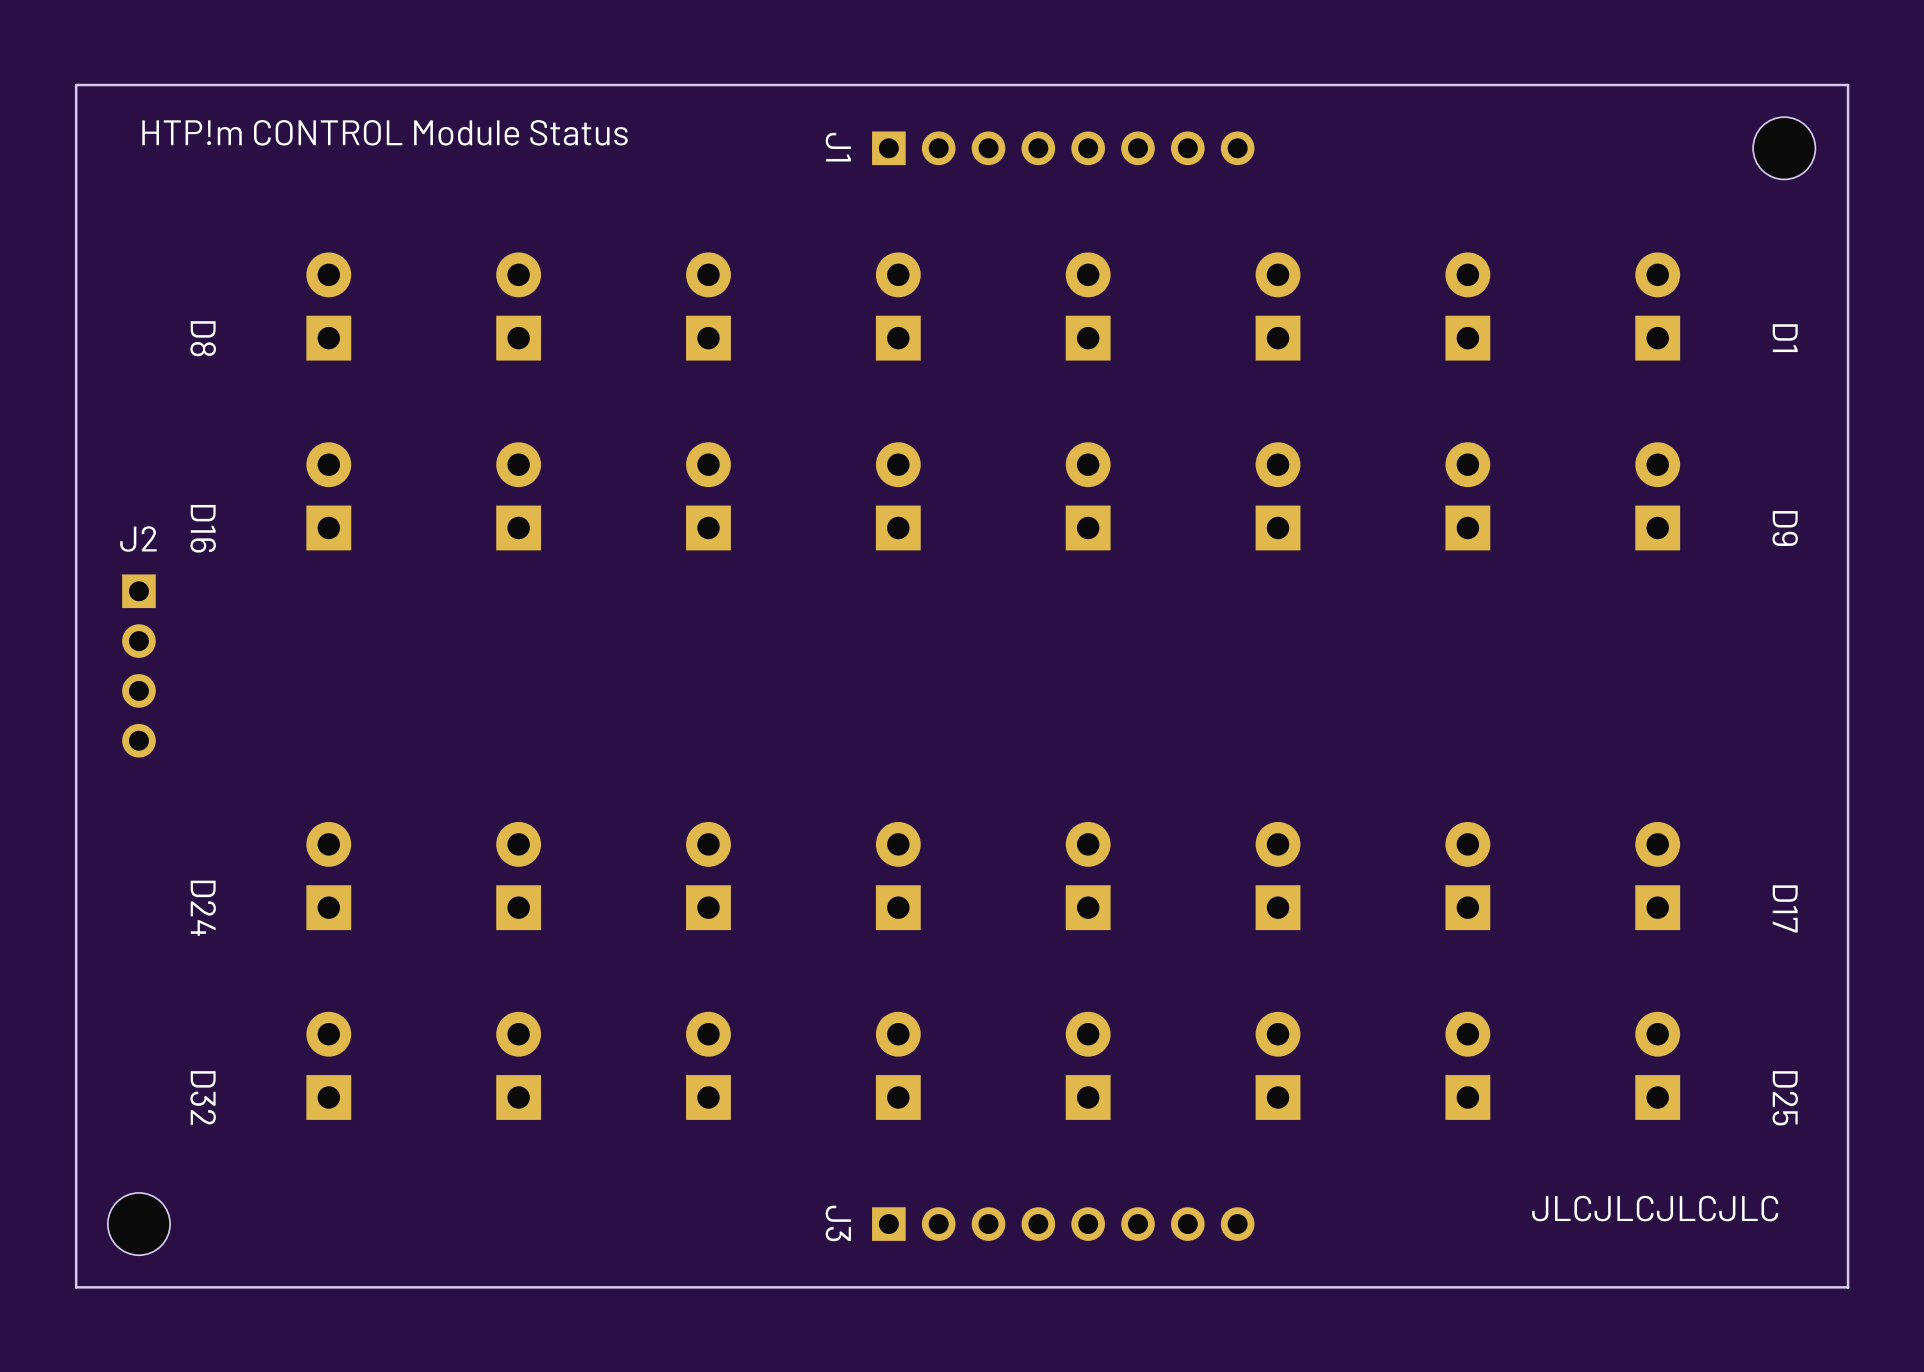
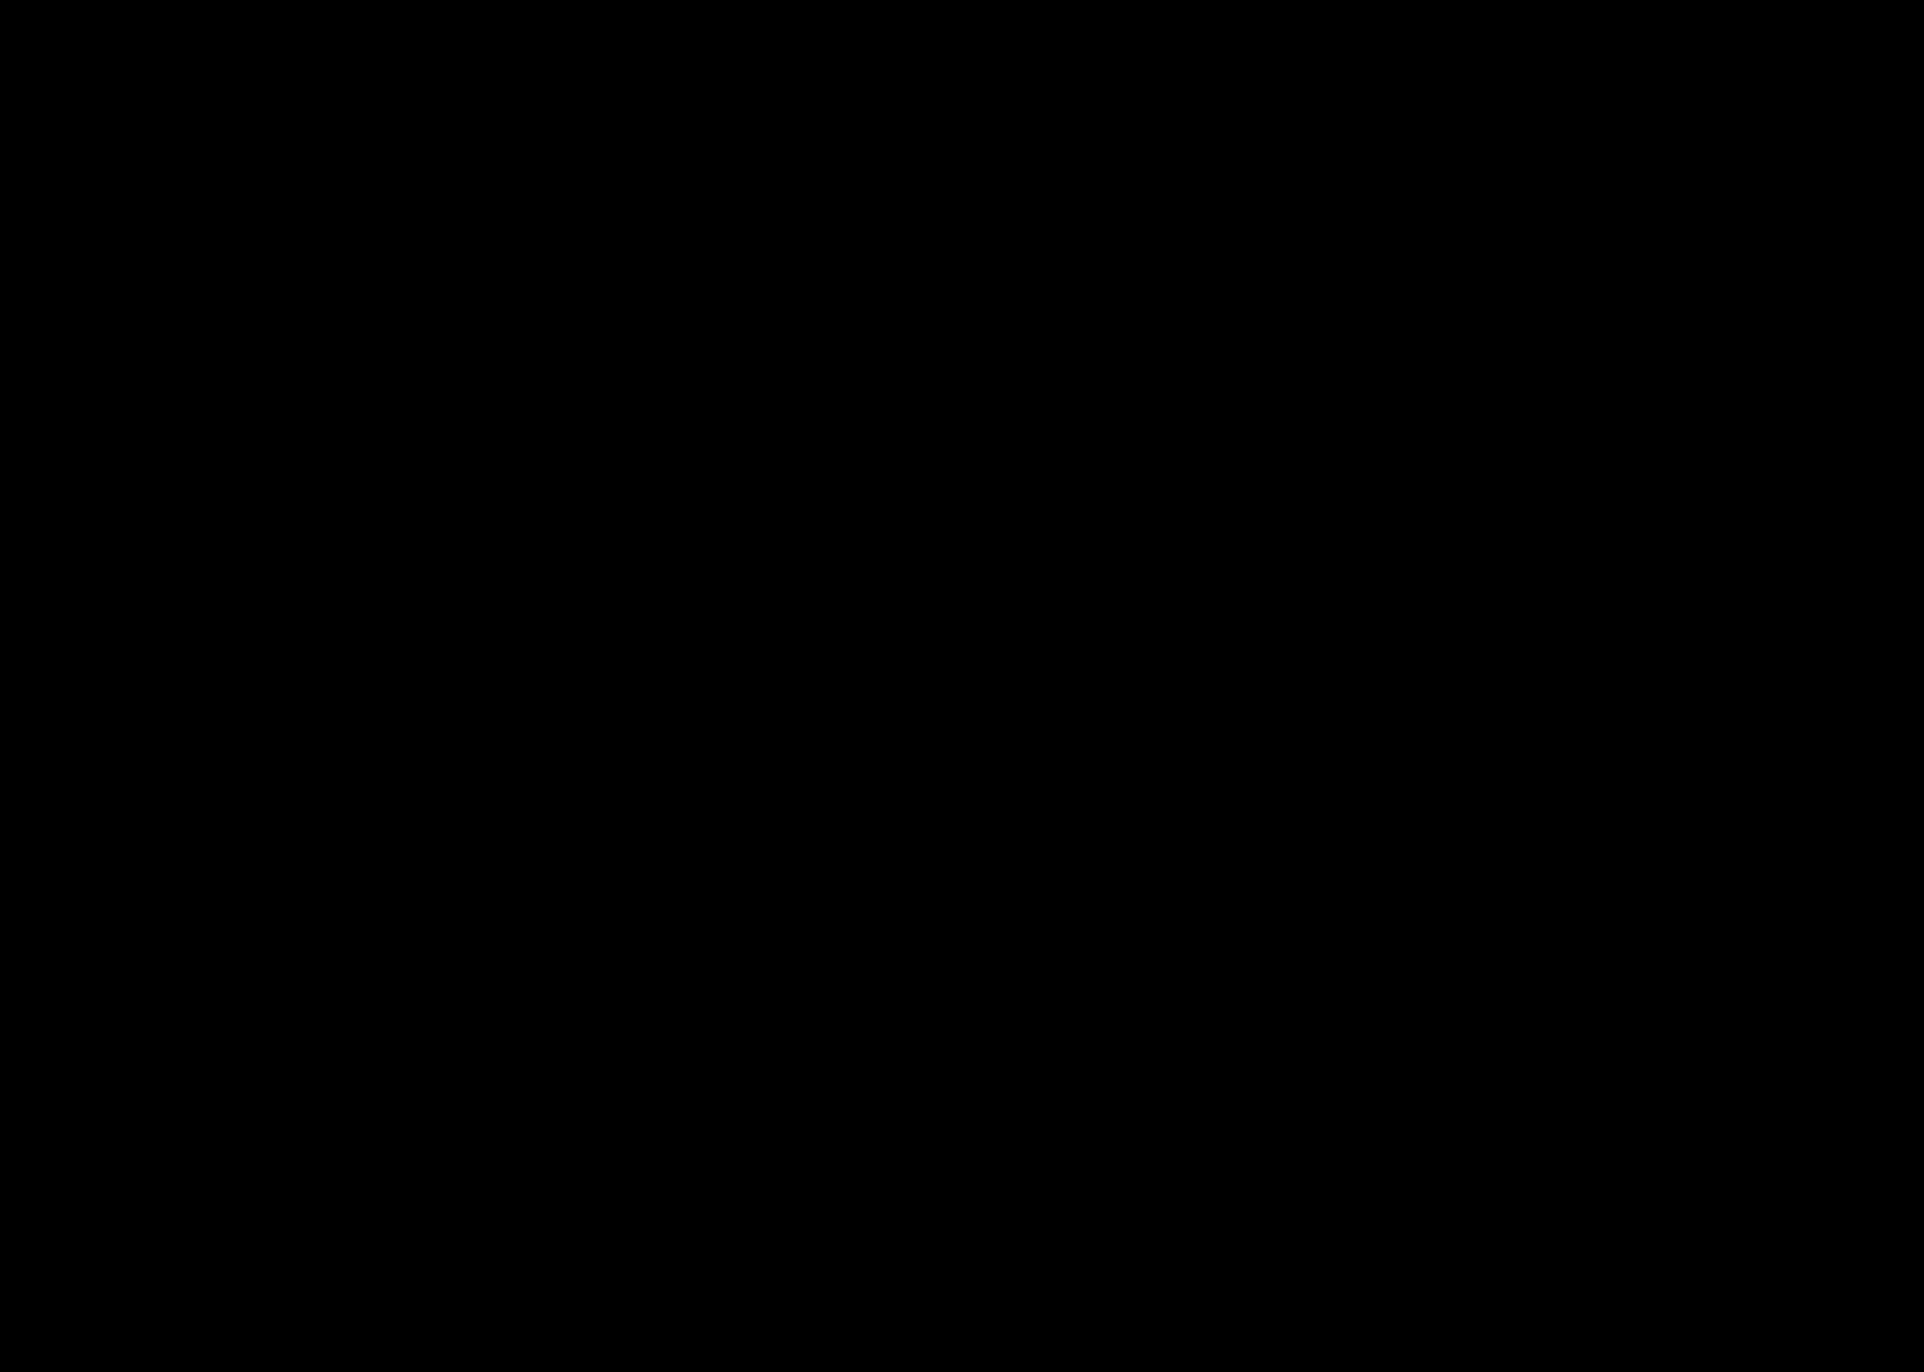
board edge: (1848, 85) (76, 85) (76, 1287) (1848, 1287) (1848, 85) -> none
text: HTP!m CONTROL Module Status (385, 132) -> none
J1: (1063, 148) -> none
part: (1784, 148) -> none
D8: (328, 306) -> none
part: (518, 306) -> none
part: (708, 306) -> none
part: (898, 306) -> none
part: (1088, 306) -> none
part: (1278, 306) -> none
part: (1467, 306) -> none
D1: (1657, 306) -> none
D16: (328, 496) -> none
part: (518, 496) -> none
part: (708, 496) -> none
part: (898, 496) -> none
part: (1088, 496) -> none
part: (1278, 496) -> none
part: (1467, 496) -> none
D9: (1657, 496) -> none
J2: (138, 666) -> none
D24: (328, 876) -> none
part: (518, 876) -> none
part: (708, 876) -> none
part: (898, 876) -> none
part: (1088, 876) -> none
part: (1278, 876) -> none
part: (1467, 876) -> none
D17: (1657, 876) -> none
D32: (328, 1065) -> none
part: (518, 1065) -> none
part: (708, 1065) -> none
part: (898, 1065) -> none
part: (1088, 1065) -> none
part: (1278, 1065) -> none
part: (1467, 1065) -> none
D25: (1657, 1065) -> none
text: JLCJLCJLCJLC (1655, 1208) -> none
part: (138, 1224) -> none
J3: (1063, 1224) -> none

